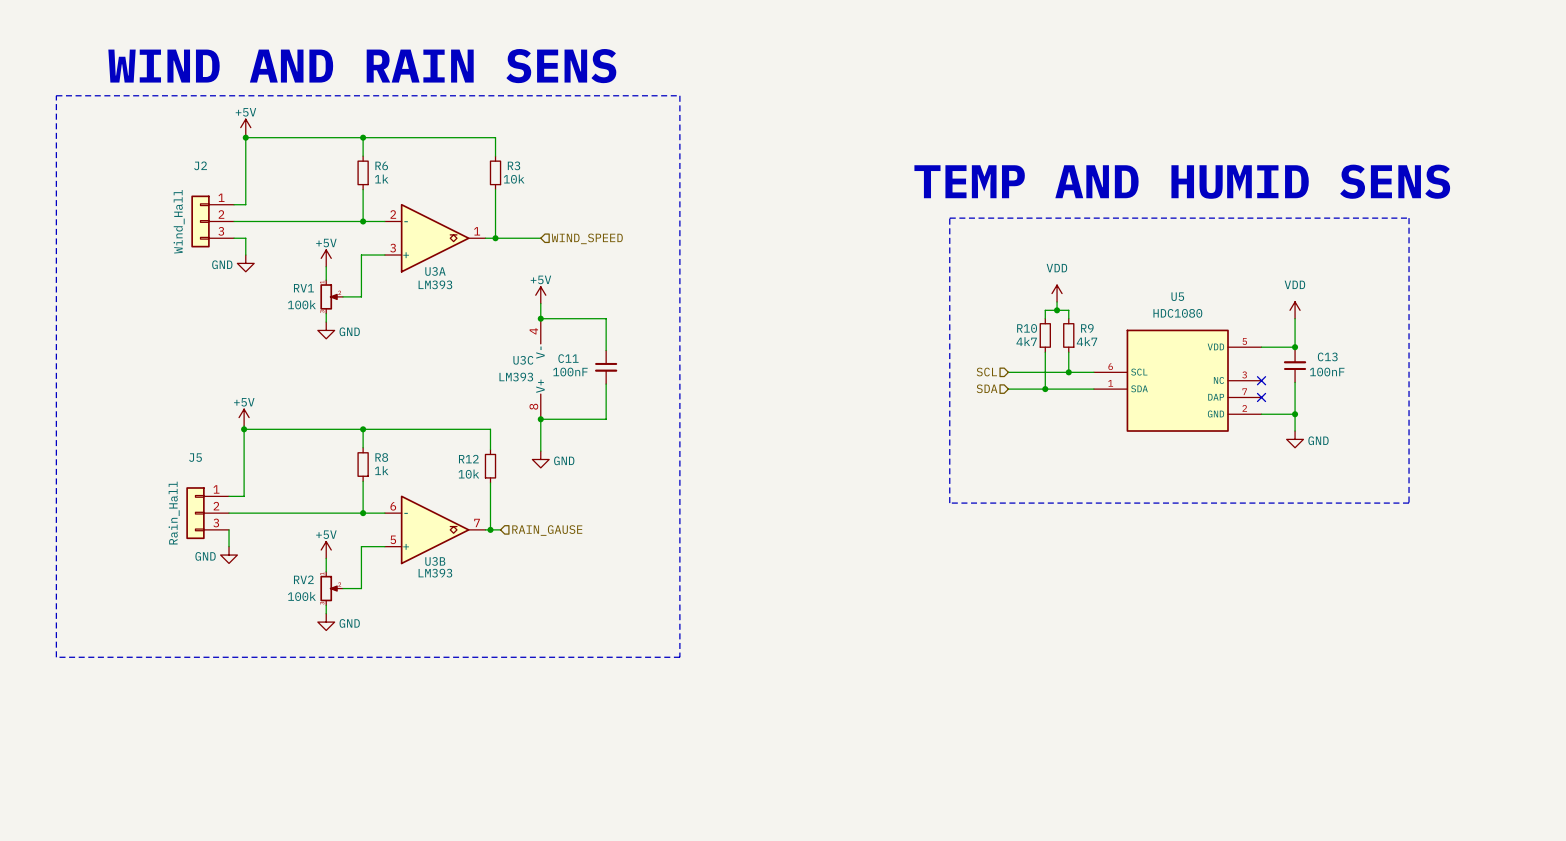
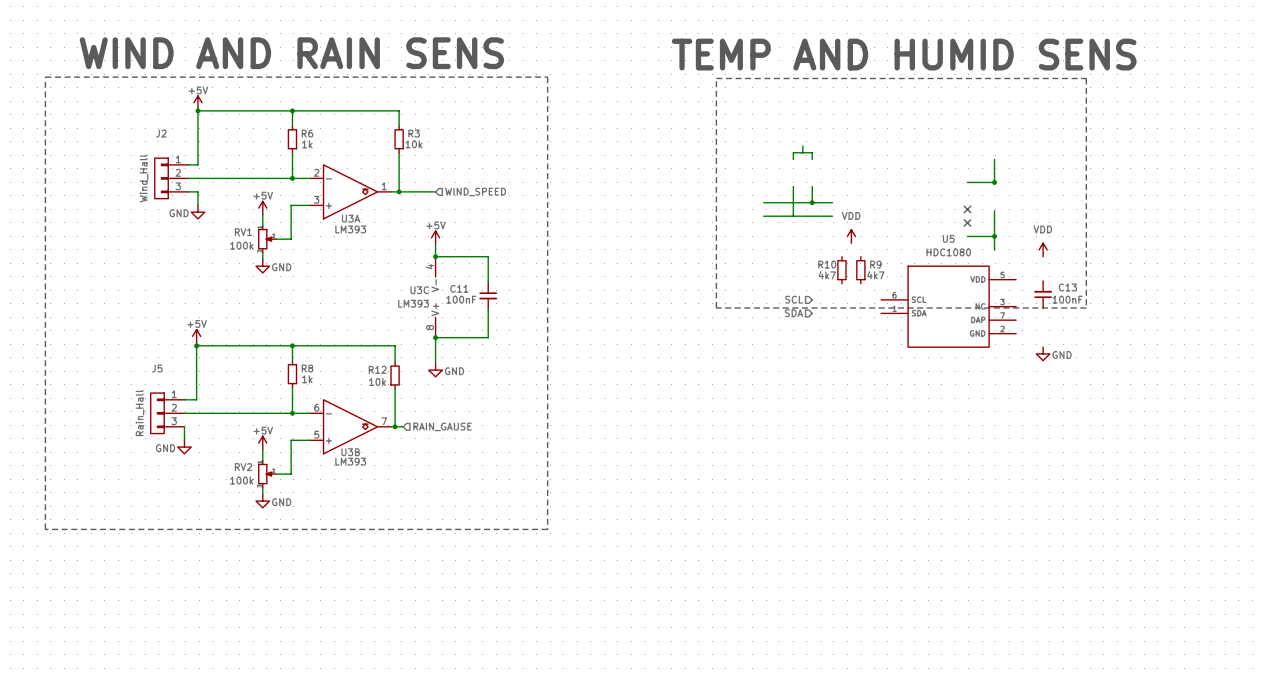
text position: TEMP AND HUMID SENS (1182, 181) -> TEMP AND HUMID SENS (904, 54)
line: (949, 218) (1409, 218) (1409, 503) (949, 503) (949, 218) -> (716, 78) (1086, 78) (1086, 308) (716, 308) (716, 78)
junction: none -> (994, 182)
junction: none -> (812, 202)
no-connect mark: none -> (967, 209)
no-connect mark: none -> (967, 222)
junction: none -> (994, 236)
wire: (1057, 301) (1057, 310) -> (802, 145) (802, 152)
junction: (1057, 310) -> none
wire: (1045, 318) (1045, 310) (1068, 310) (1068, 318) -> (793, 159) (793, 152) (812, 152) (812, 159)
wire: (1295, 318) (1295, 348) -> (994, 159) (994, 183)
wire: (1261, 347) (1295, 347) -> (967, 182) (994, 182)
junction: (1295, 347) -> none
wire: (1045, 352) (1045, 389) -> (793, 186) (793, 216)
wire: (1068, 352) (1068, 372) -> (812, 186) (812, 202)
wire: (1008, 372) (1093, 372) -> (763, 202) (832, 202)
junction: (1068, 372) -> none
no-connect mark: (1261, 380) -> none
wire: (1295, 382) (1295, 431) -> (994, 210) (994, 249)
wire: (1008, 389) (1093, 389) -> (763, 216) (832, 216)
junction: (1045, 389) -> none
no-connect mark: (1261, 397) -> none
wire: (1261, 414) (1295, 414) -> (967, 236) (994, 236)
junction: (1295, 414) -> none

